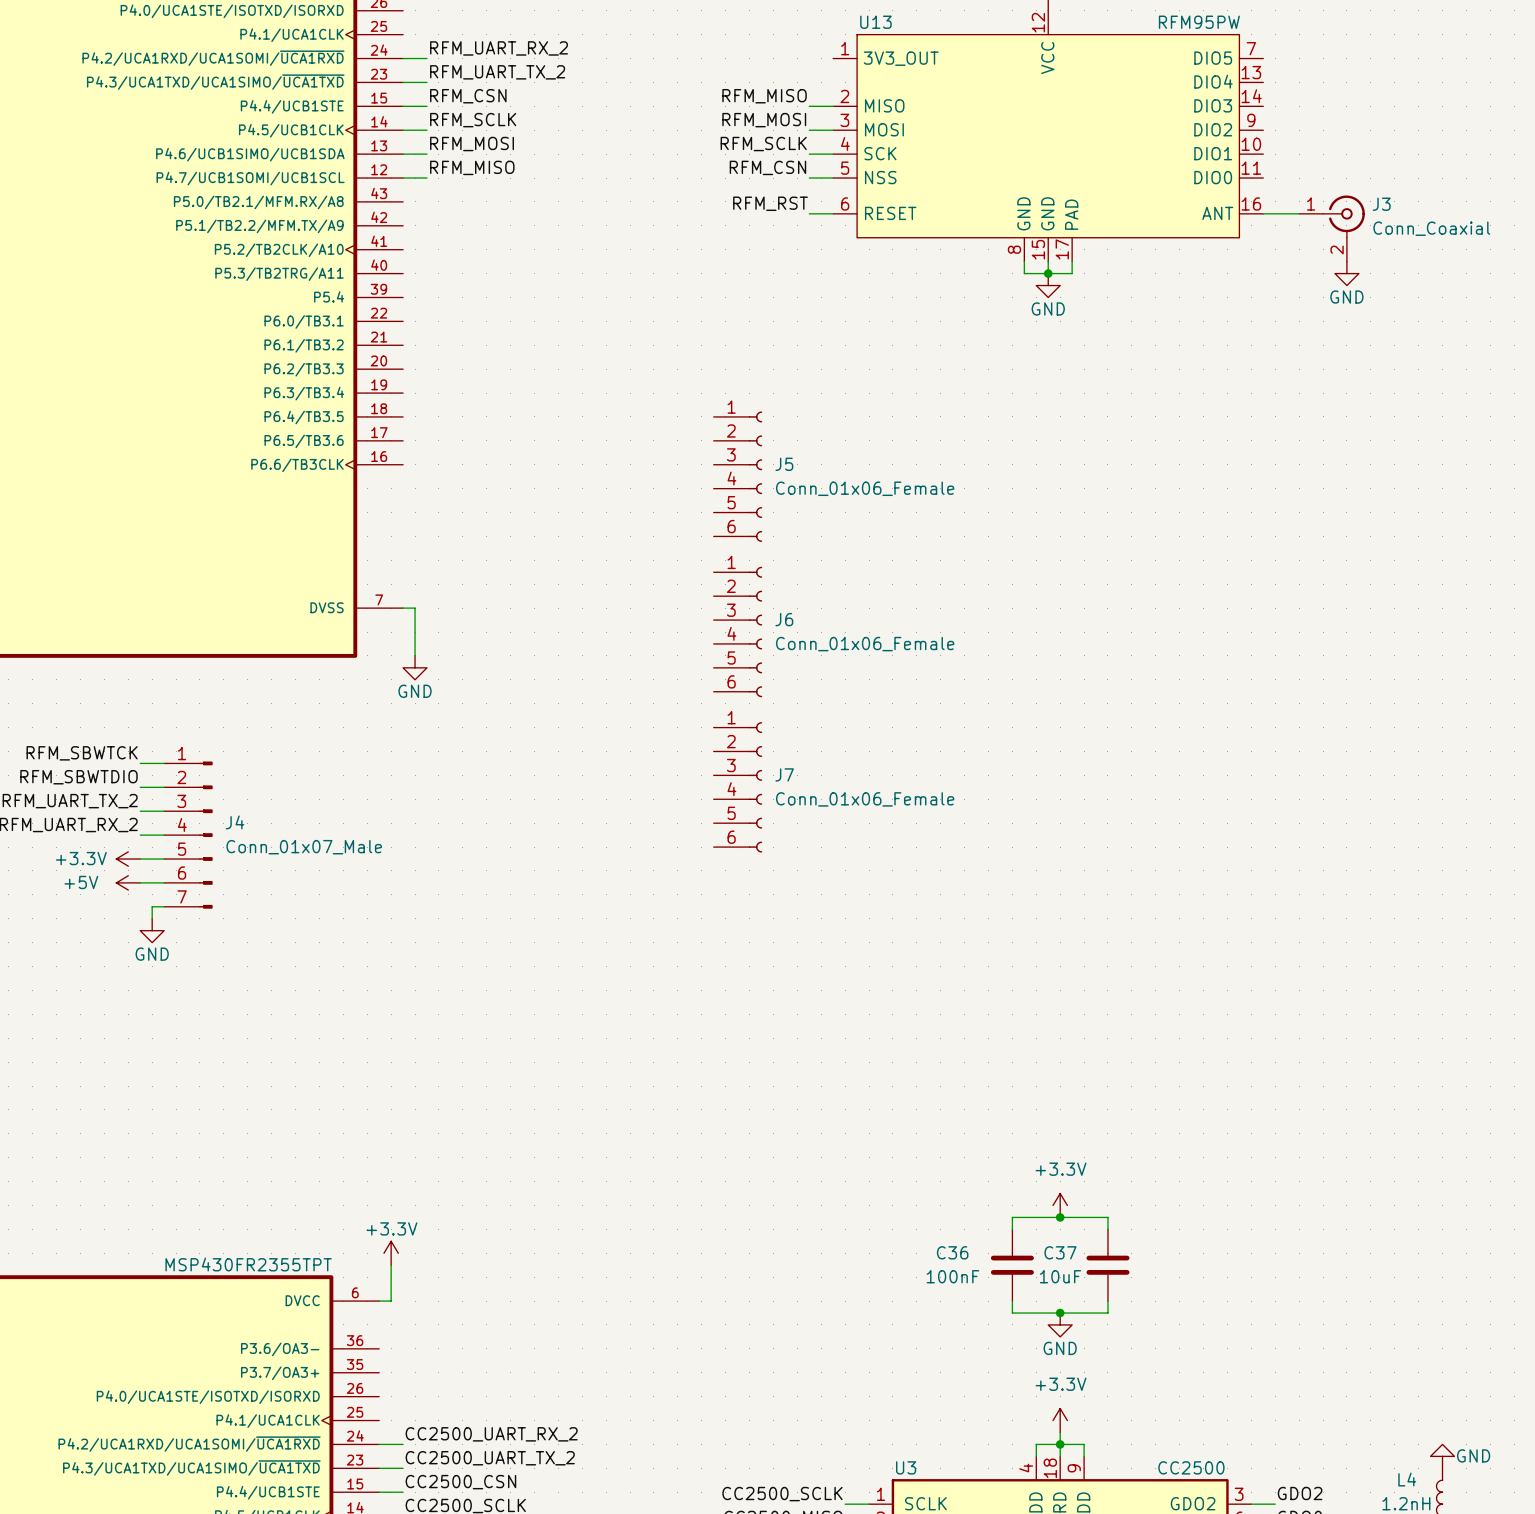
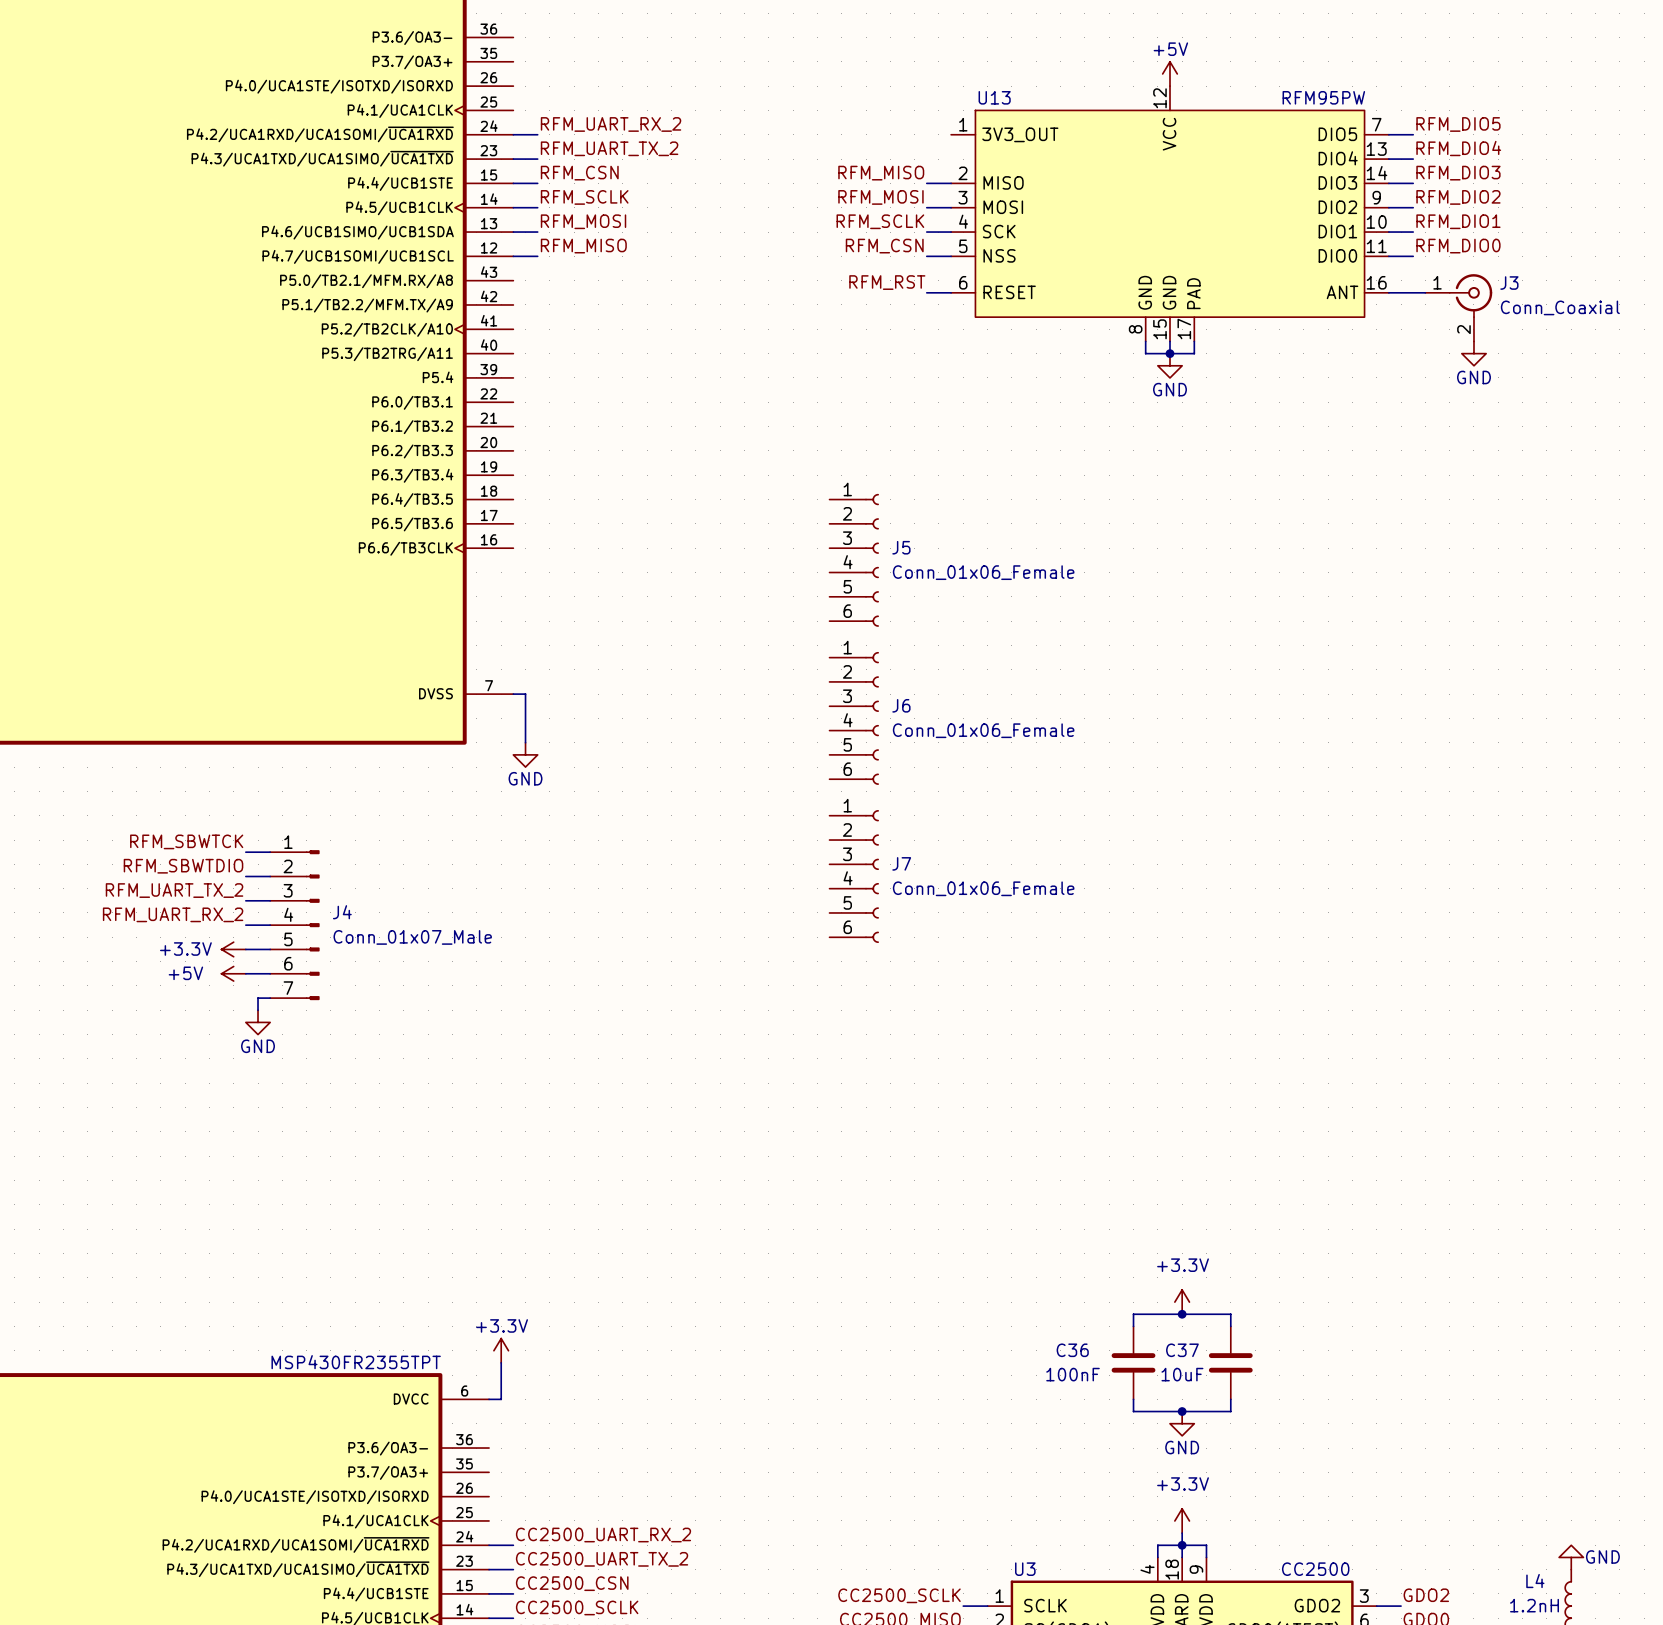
label: none -> RFM_DIO5 (1458, 124)
wire: none -> (1388, 134) (1413, 134)
label: none -> RFM_DIO4 (1458, 148)
wire: none -> (1388, 159) (1413, 159)
label: none -> RFM_DIO3 (1458, 173)
wire: none -> (1388, 183) (1413, 183)
label: none -> RFM_DIO2 (1458, 197)
wire: none -> (1388, 207) (1413, 207)
label: none -> RFM_DIO1 (1458, 221)
wire: none -> (1388, 232) (1413, 232)
label: none -> RFM_DIO0 (1458, 246)
wire: none -> (1388, 256) (1413, 256)

